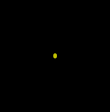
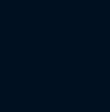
board edge: (55, 55) (55, 56) -> none

